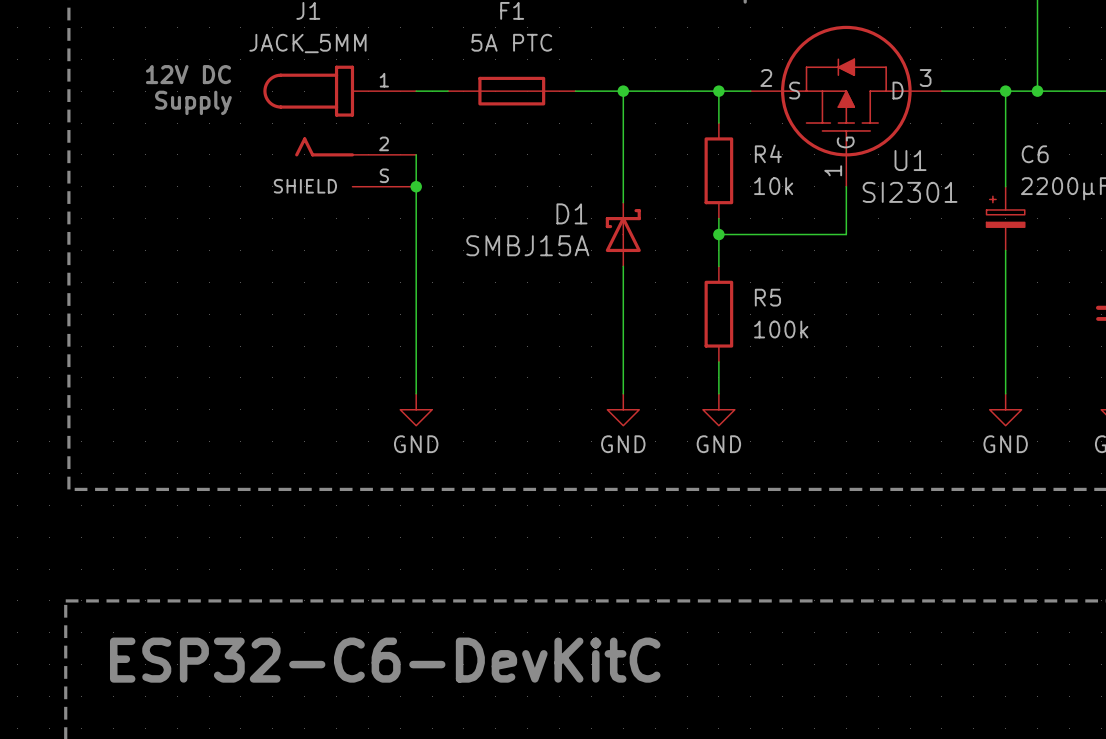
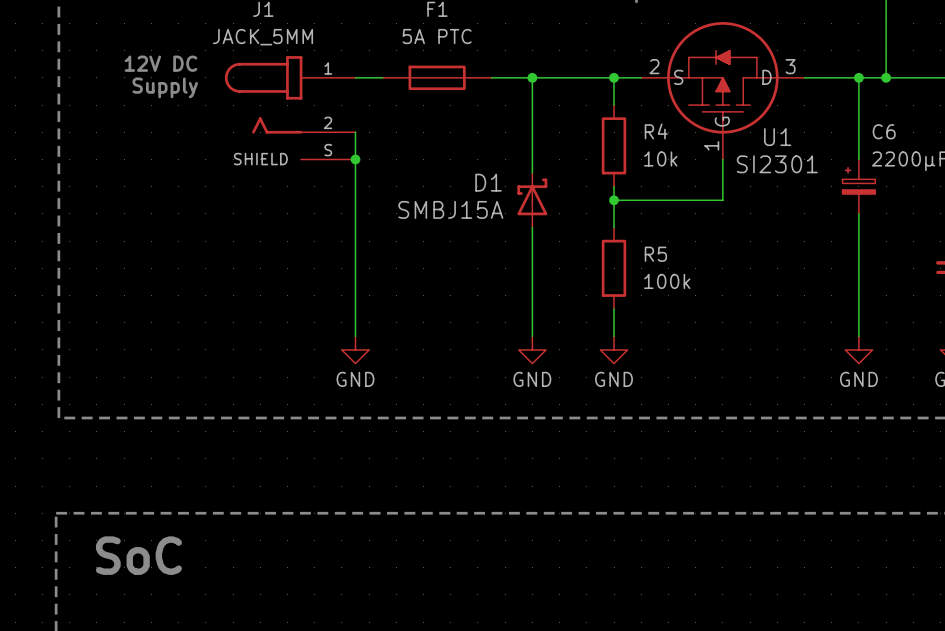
text: none -> SoC (138, 555)
text: ESP32-C6-DevKitC (385, 660) -> none

